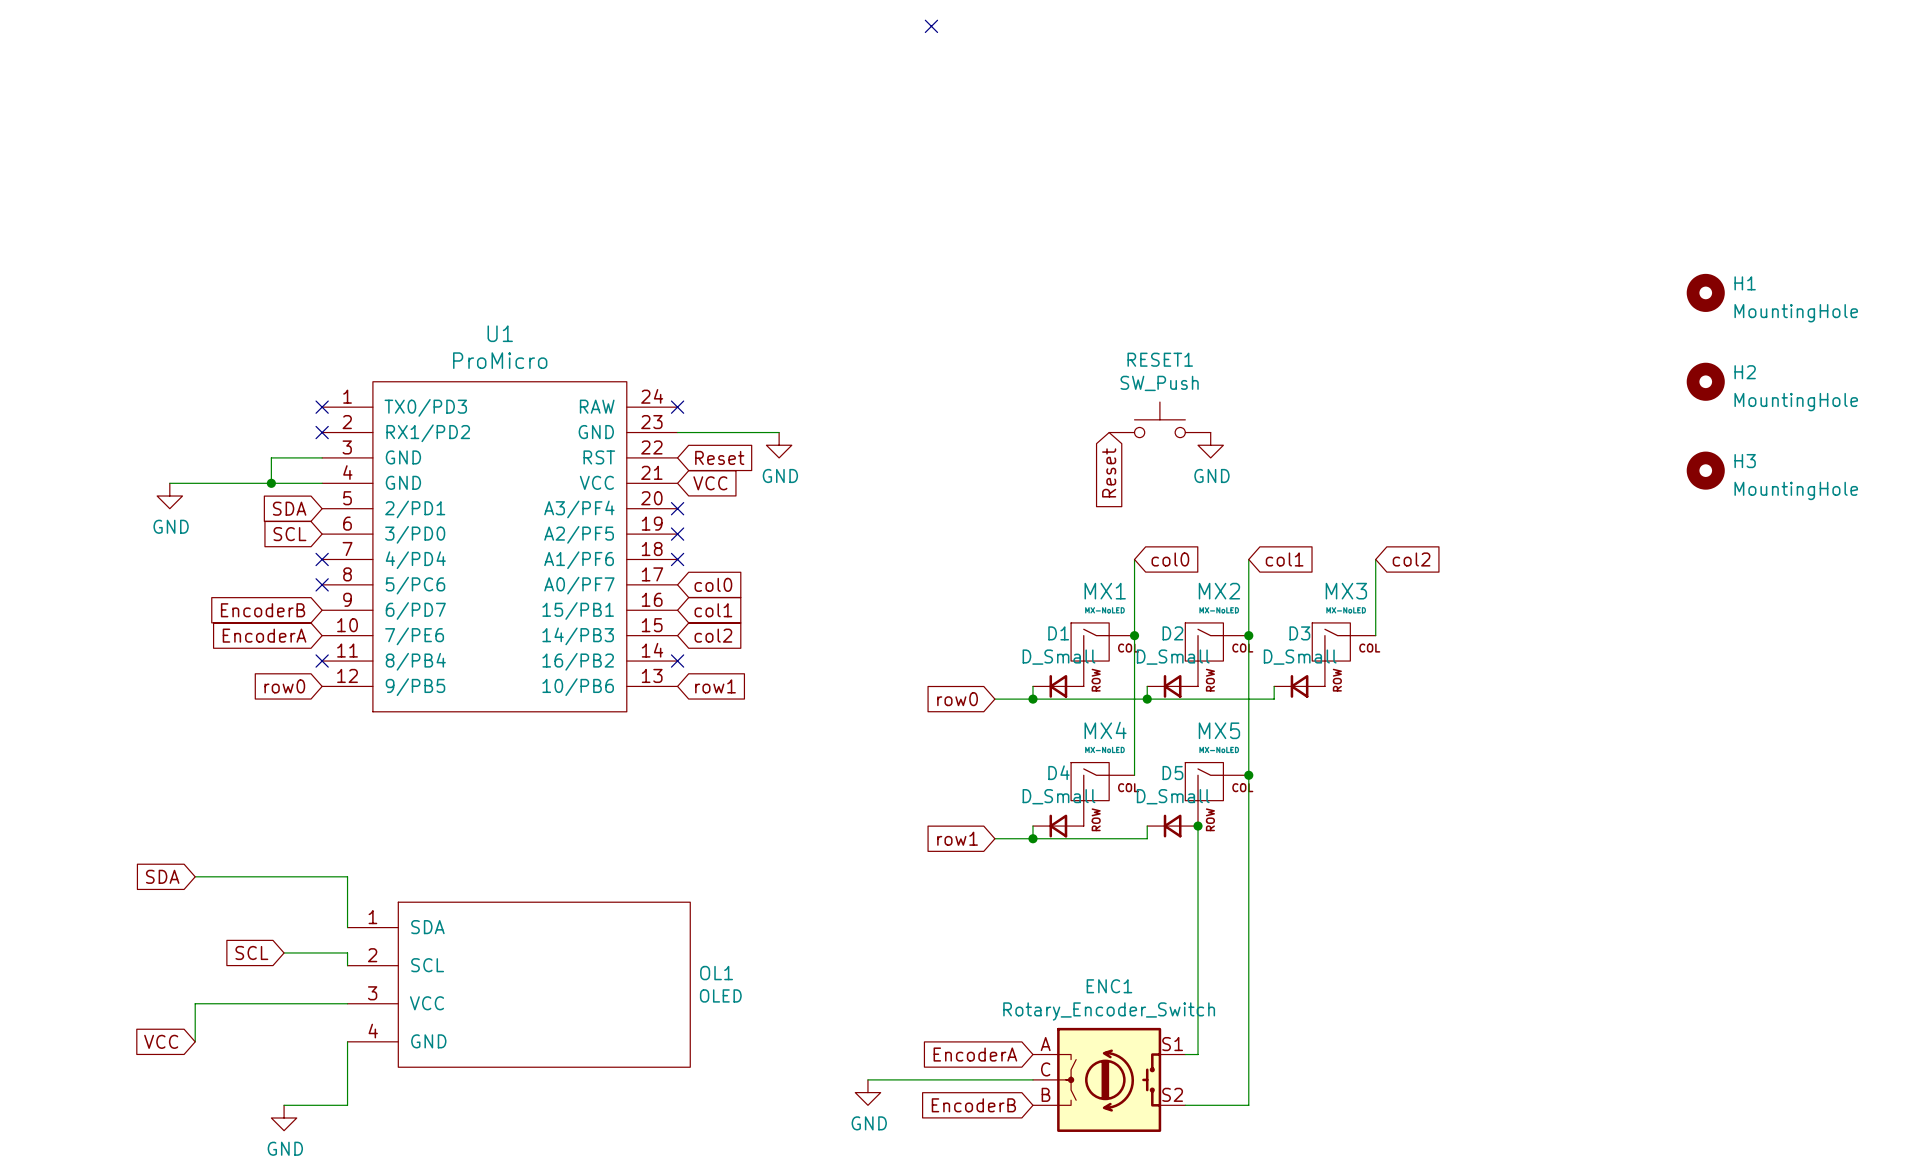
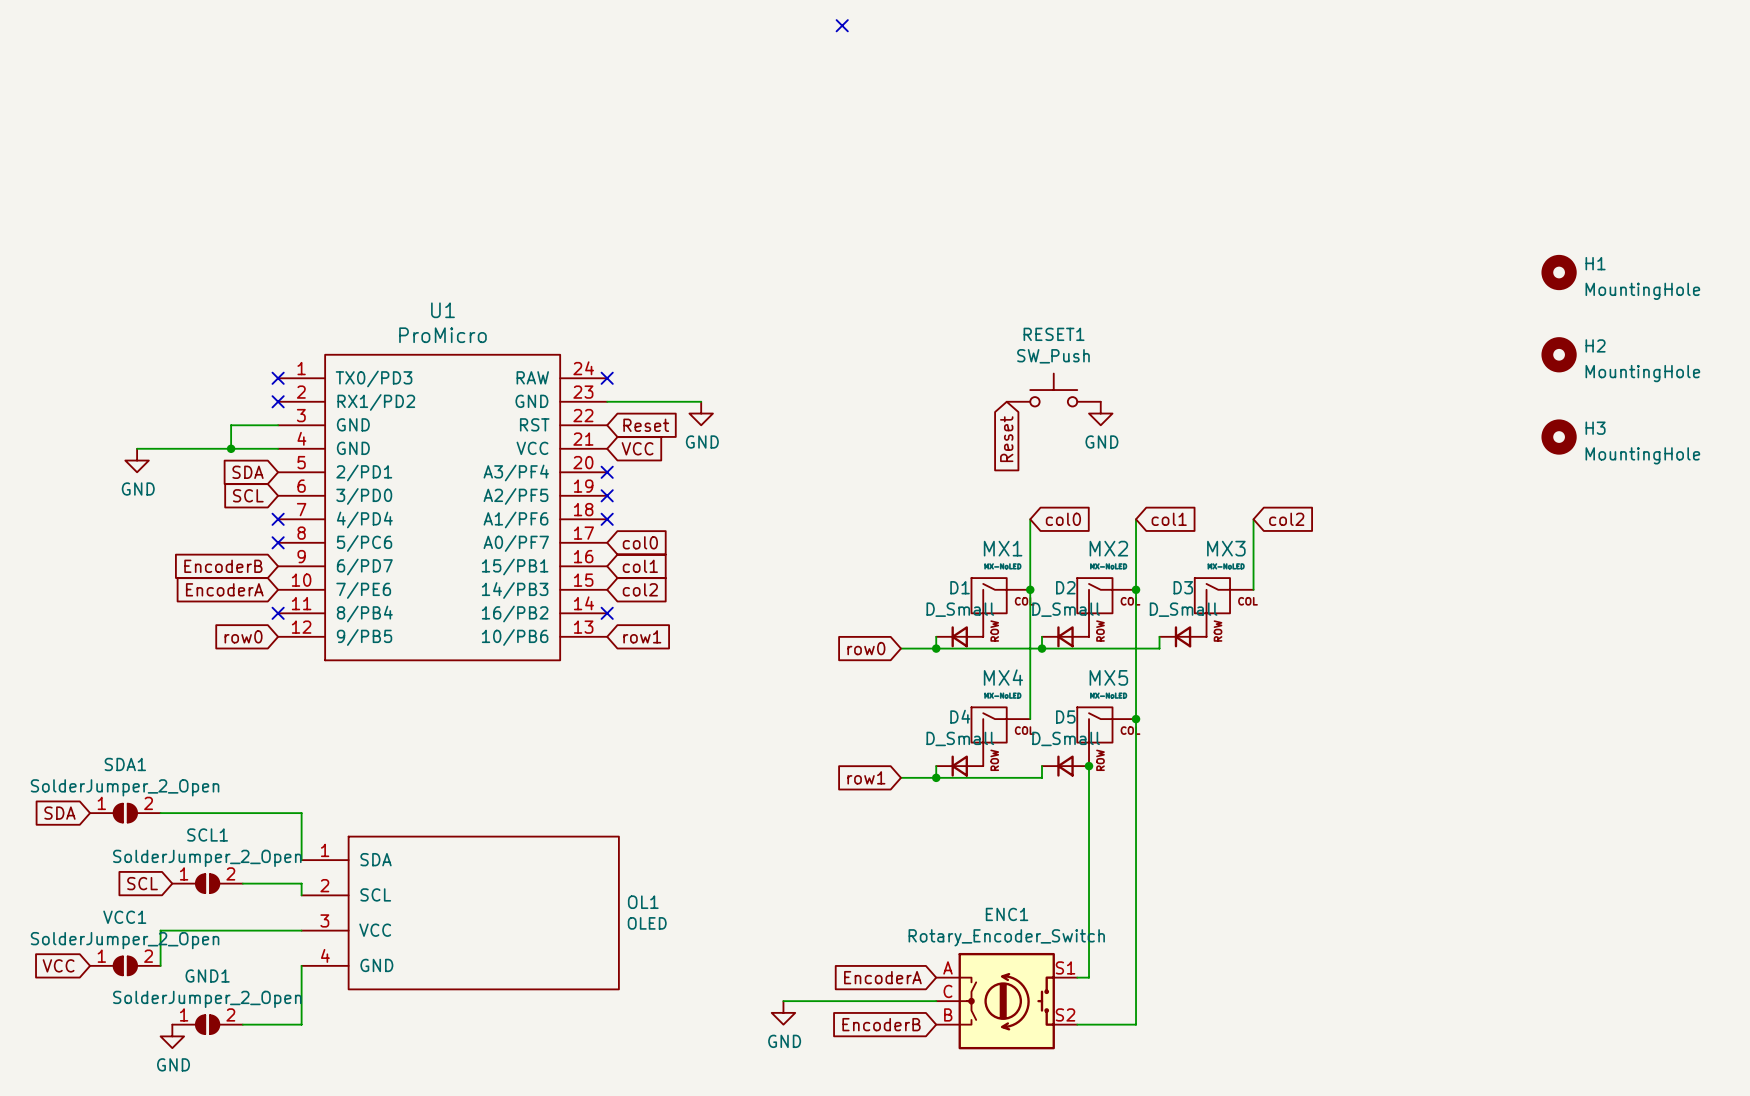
SDA1: none -> SolderJumper_2_Open (125, 813)
global label position: SDA (162, 876) -> SDA (59, 813)
SCL1: none -> SolderJumper_2_Open (207, 883)
global label position: SCL (251, 952) -> SCL (142, 883)
VCC1: none -> SolderJumper_2_Open (125, 965)
global label position: VCC (161, 1041) -> VCC (58, 965)
GND1: none -> SolderJumper_2_Open (207, 1024)
power symbol position: GND (284, 1118) -> GND (172, 1036)

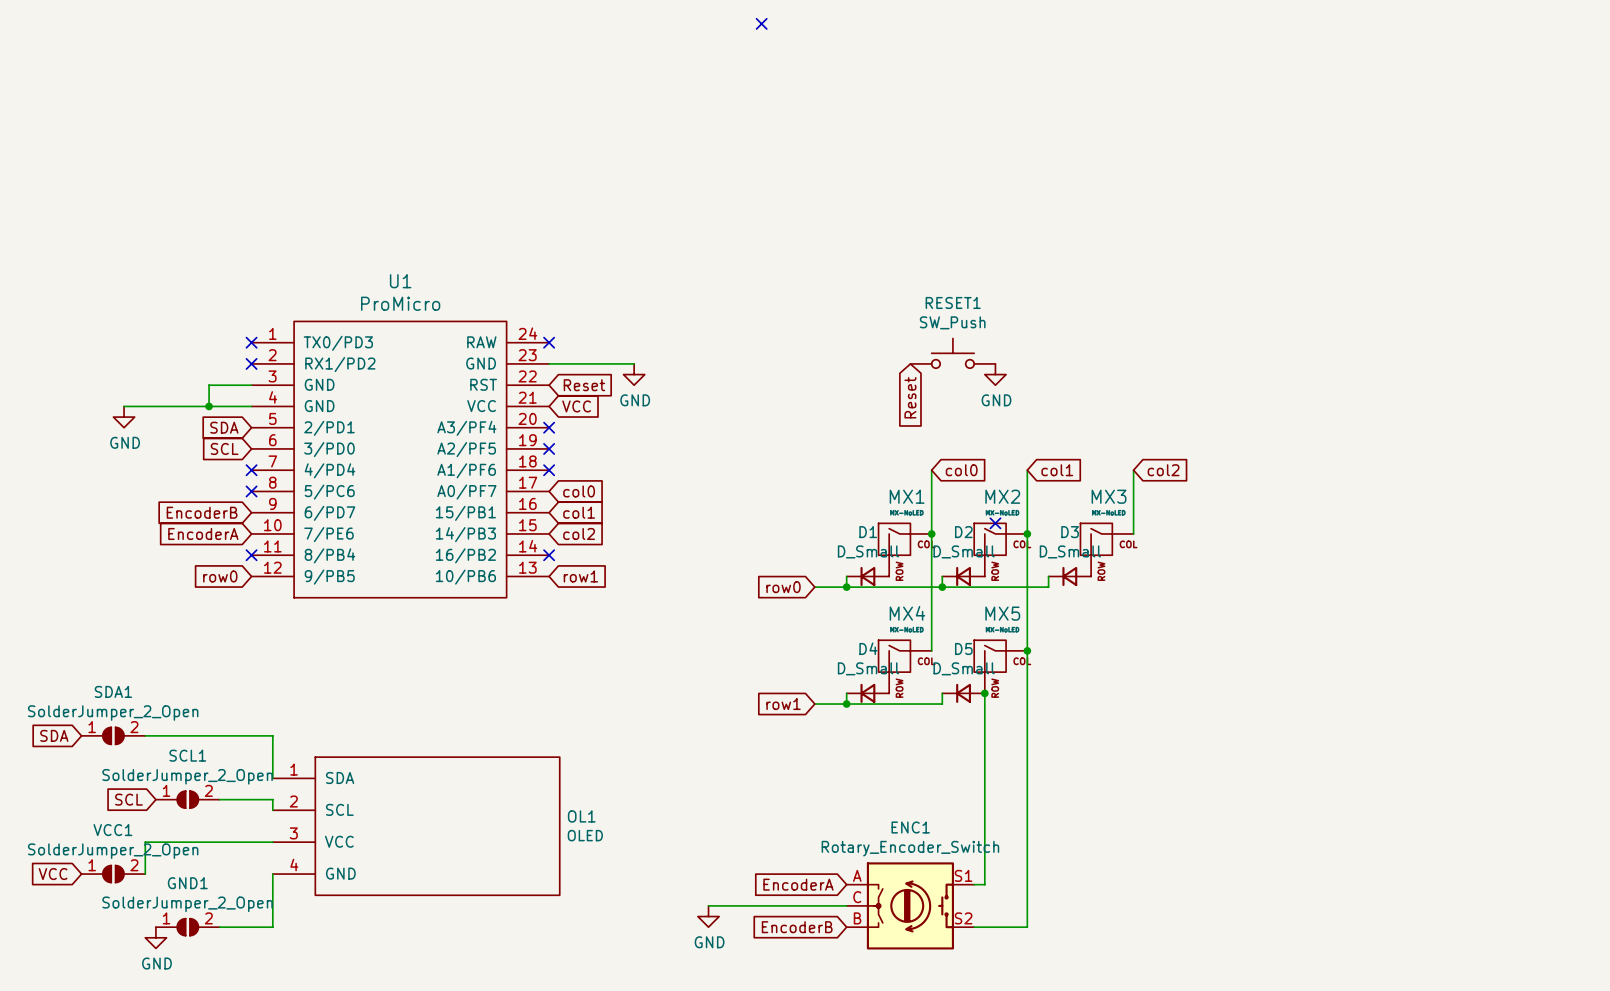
H1: MountingHole (1559, 272) -> none
H2: MountingHole (1559, 354) -> none
H3: MountingHole (1559, 437) -> none
no-connect mark: none -> (995, 523)

